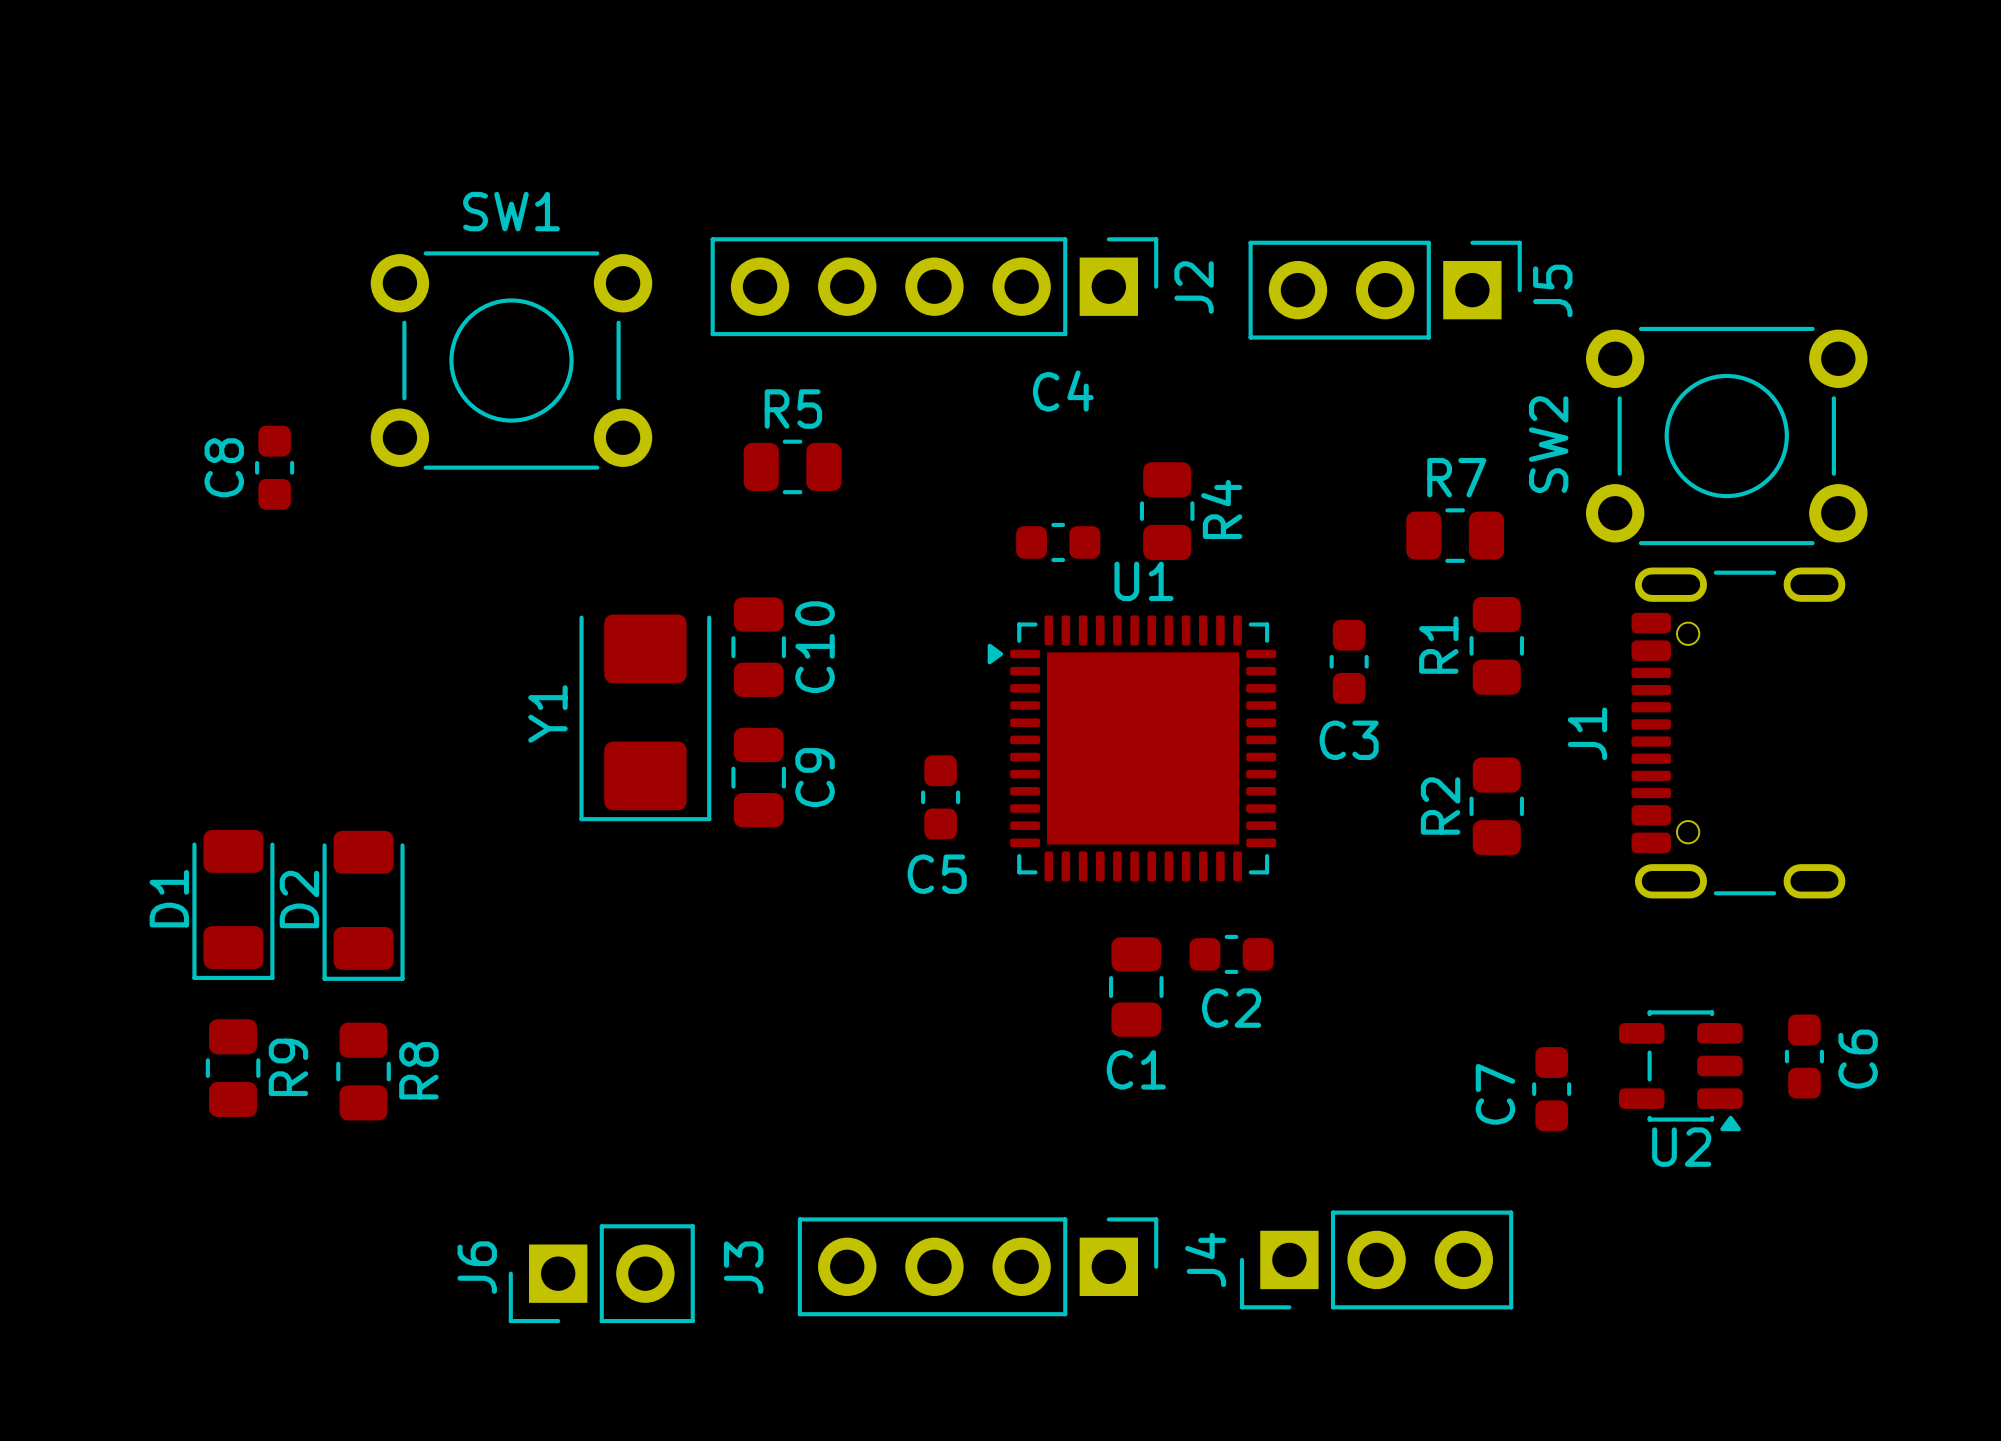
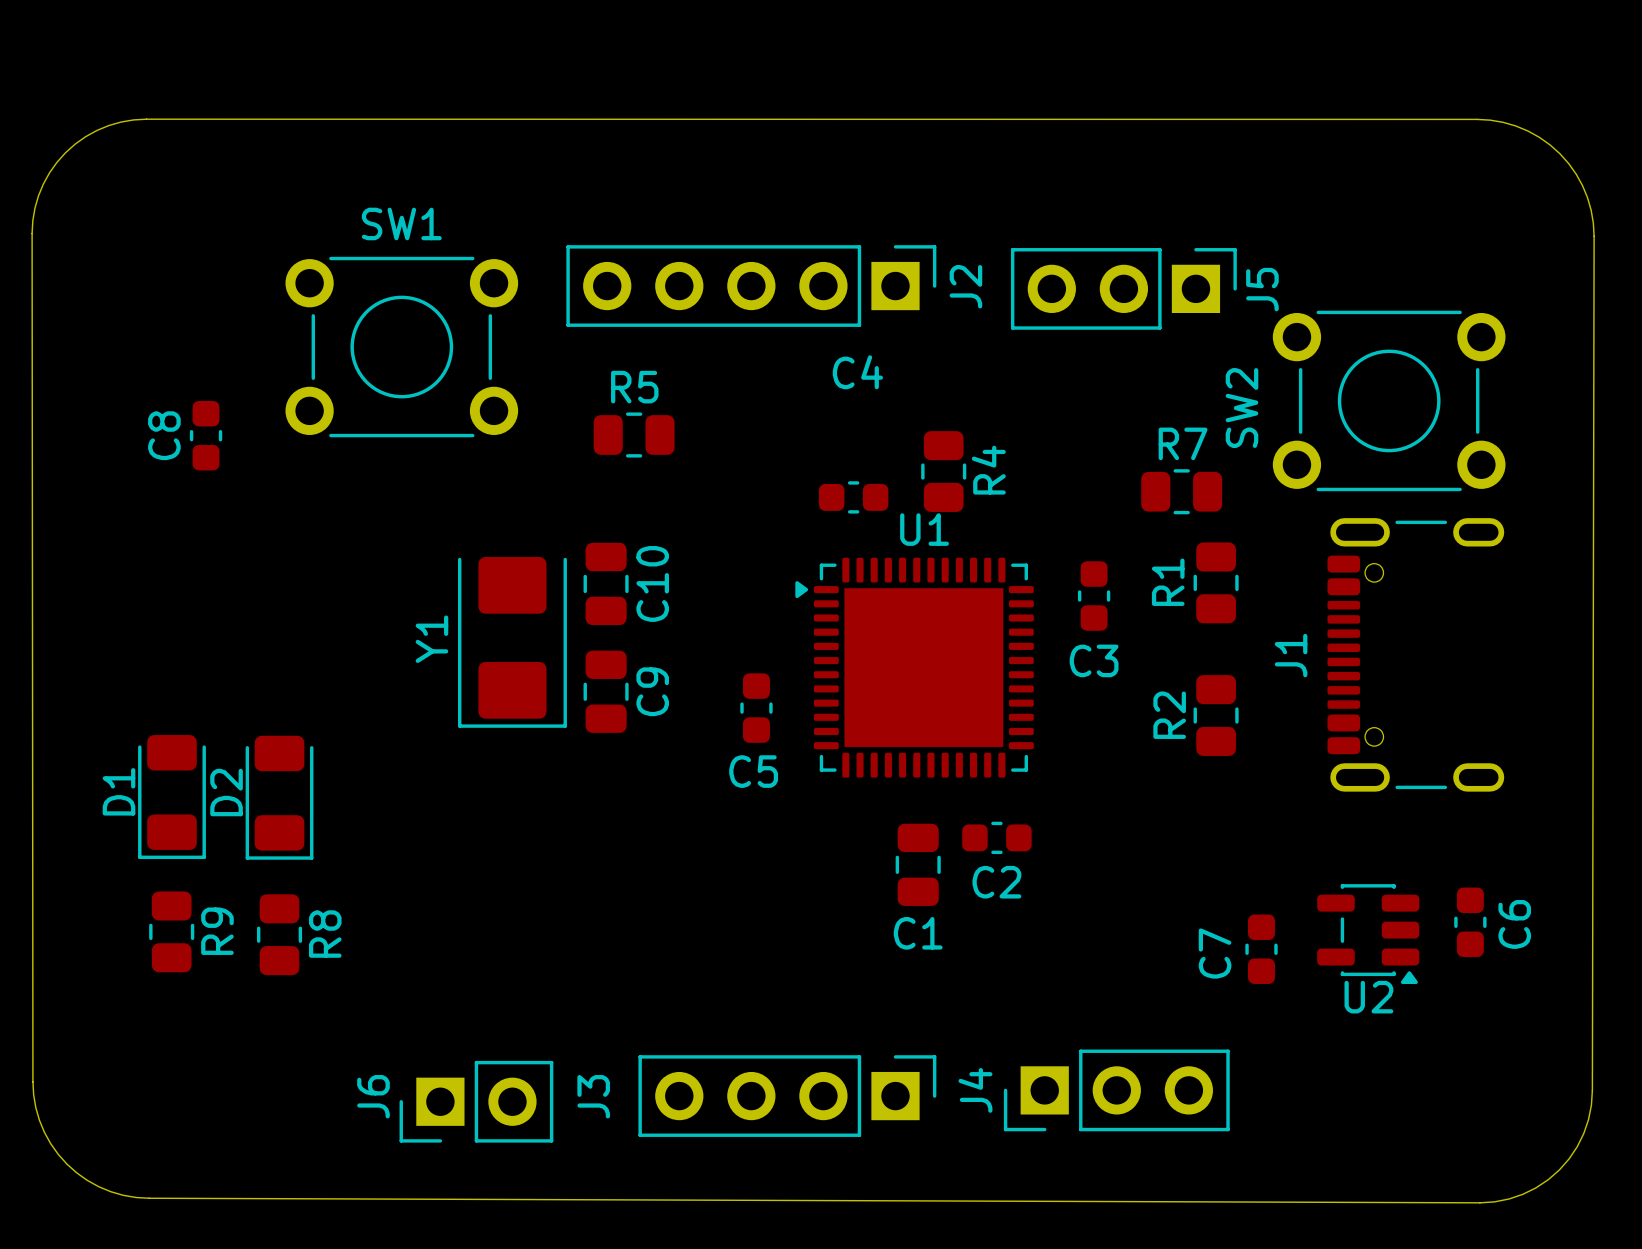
board edge: none -> (146, 119) (1477, 119) (1515, 125) (1550, 144) (1568, 163) (1582, 185) (1591, 210) (1594, 236) (1592, 1090) (1588, 1119) (1577, 1146) (1569, 1158) (1559, 1169) (1536, 1187) (1509, 1198) (1479, 1202) (149, 1198) (110, 1191) (76, 1172) (58, 1154) (44, 1132) (35, 1107) (32, 1081) (32, 220) (43, 183) (65, 152) (96, 130) (121, 122) (146, 119)
SW2 position: (1726, 436) -> (1389, 400)

